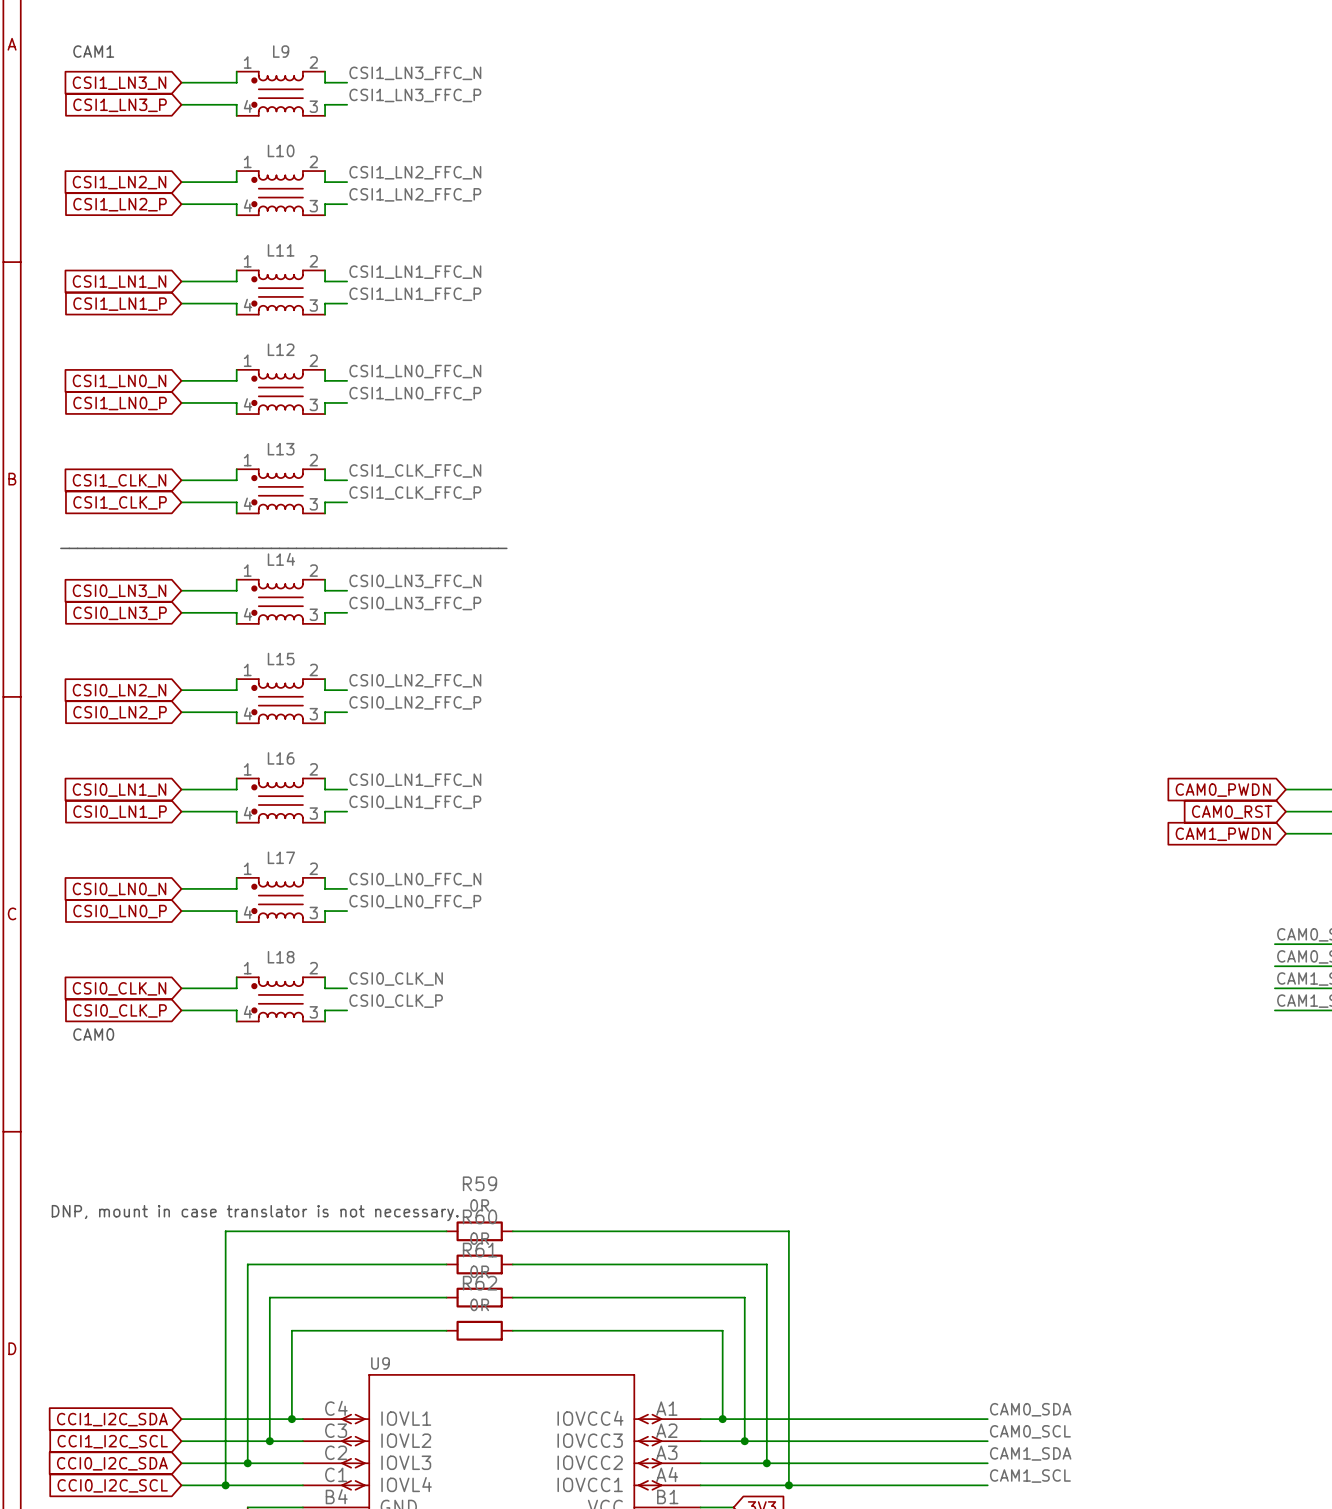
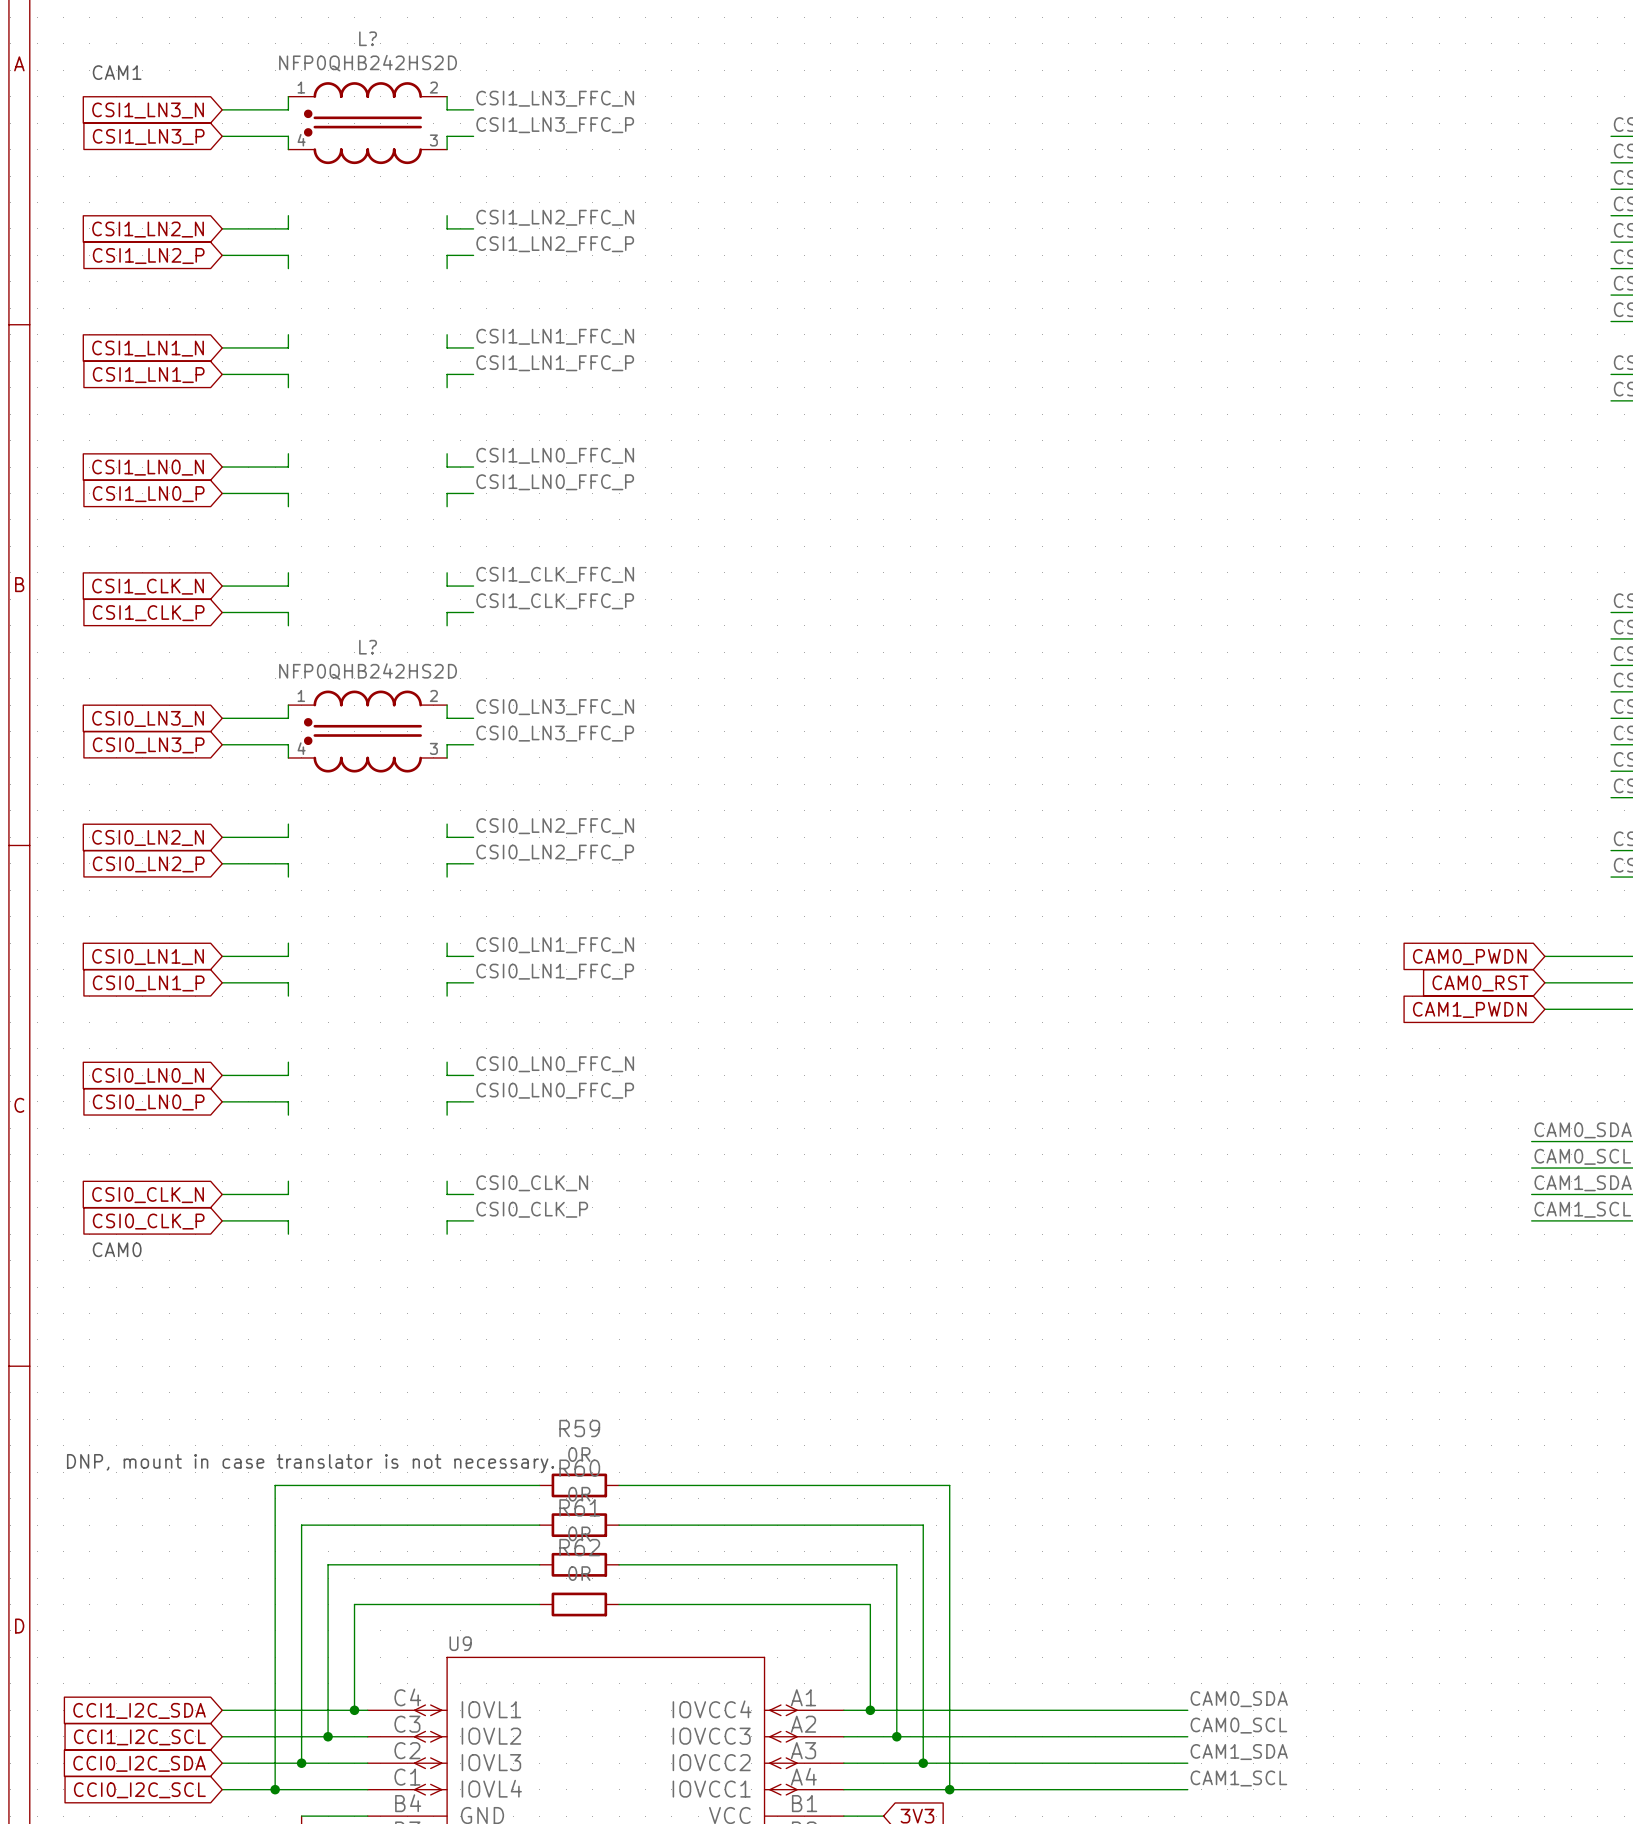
wire: (325, 71) (325, 82) (347, 82) -> (447, 96) (447, 109) (473, 109)
label position: CSI1_LN3_FFC_N (415, 73) -> CSI1_LN3_FFC_N (555, 98)
L9: (280, 93) -> none
L?: none -> NFP0QHB242HS2D (367, 123)
label position: CSI1_LN3_FFC_P (415, 95) -> CSI1_LN3_FFC_P (555, 125)
wire: (347, 104) (325, 104) (325, 115) -> (473, 136) (447, 136) (447, 149)
wire: (325, 171) (325, 182) (347, 182) -> (447, 215) (447, 228) (473, 228)
label position: CSI1_LN2_FFC_N (415, 172) -> CSI1_LN2_FFC_N (555, 217)
L10: (280, 193) -> none
label position: CSI1_LN2_FFC_P (415, 194) -> CSI1_LN2_FFC_P (555, 244)
wire: (347, 204) (325, 204) (325, 215) -> (473, 255) (447, 255) (447, 268)
wire: (325, 270) (325, 281) (347, 281) -> (447, 334) (447, 347) (473, 347)
label position: CSI1_LN1_FFC_N (415, 272) -> CSI1_LN1_FFC_N (555, 336)
L11: (280, 292) -> none
label position: CSI1_LN1_FFC_P (415, 294) -> CSI1_LN1_FFC_P (555, 363)
wire: (347, 303) (325, 303) (325, 314) -> (473, 374) (447, 374) (447, 387)
wire: (325, 369) (325, 380) (347, 380) -> (447, 453) (447, 467) (473, 467)
label position: CSI1_LN0_FFC_N (415, 371) -> CSI1_LN0_FFC_N (555, 455)
L12: (280, 391) -> none
label position: CSI1_LN0_FFC_P (415, 393) -> CSI1_LN0_FFC_P (555, 482)
wire: (347, 402) (325, 402) (325, 414) -> (473, 493) (447, 493) (447, 506)
wire: (325, 469) (325, 480) (347, 480) -> (447, 572) (447, 586) (473, 586)
label position: CSI1_CLK_FFC_N (415, 470) -> CSI1_CLK_FFC_N (555, 574)
L13: (280, 491) -> none
label position: CSI1_CLK_FFC_P (415, 493) -> CSI1_CLK_FFC_P (555, 601)
wire: (347, 502) (325, 502) (325, 513) -> (473, 612) (447, 612) (447, 625)
text: _____________________________________________________ (283, 548) -> none
wire: (325, 579) (325, 590) (347, 590) -> (447, 705) (447, 718) (473, 718)
label position: CSI0_LN3_FFC_N (415, 581) -> CSI0_LN3_FFC_N (555, 707)
L14: (280, 601) -> none
L?: none -> NFP0QHB242HS2D (367, 731)
label position: CSI0_LN3_FFC_P (415, 603) -> CSI0_LN3_FFC_P (555, 733)
wire: (347, 612) (325, 612) (325, 623) -> (473, 744) (447, 744) (447, 757)
wire: (325, 679) (325, 690) (347, 690) -> (447, 824) (447, 837) (473, 837)
label position: CSI0_LN2_FFC_N (415, 680) -> CSI0_LN2_FFC_N (555, 826)
L15: (280, 701) -> none
label position: CSI0_LN2_FFC_P (415, 702) -> CSI0_LN2_FFC_P (555, 852)
wire: (347, 712) (325, 712) (325, 723) -> (473, 863) (447, 863) (447, 877)
wire: (325, 778) (325, 789) (347, 789) -> (447, 943) (447, 956) (473, 956)
label position: CSI0_LN1_FFC_N (415, 780) -> CSI0_LN1_FFC_N (555, 945)
L16: (280, 800) -> none
label position: CSI0_LN1_FFC_P (415, 802) -> CSI0_LN1_FFC_P (555, 971)
wire: (347, 811) (325, 811) (325, 822) -> (473, 982) (447, 982) (447, 996)
wire: (325, 877) (325, 888) (347, 888) -> (447, 1062) (447, 1075) (473, 1075)
label position: CSI0_LN0_FFC_N (415, 879) -> CSI0_LN0_FFC_N (555, 1064)
L17: (280, 899) -> none
label position: CSI0_LN0_FFC_P (415, 901) -> CSI0_LN0_FFC_P (555, 1090)
wire: (347, 911) (325, 911) (325, 922) -> (473, 1101) (447, 1101) (447, 1115)
wire: (325, 977) (325, 988) (347, 988) -> (447, 1181) (447, 1194) (473, 1194)
label position: CSI0_CLK_N (396, 979) -> CSI0_CLK_N (532, 1183)
L18: (280, 999) -> none
label position: CSI0_CLK_P (396, 1001) -> CSI0_CLK_P (532, 1209)
wire: (347, 1010) (325, 1010) (325, 1021) -> (473, 1220) (447, 1220) (447, 1234)

